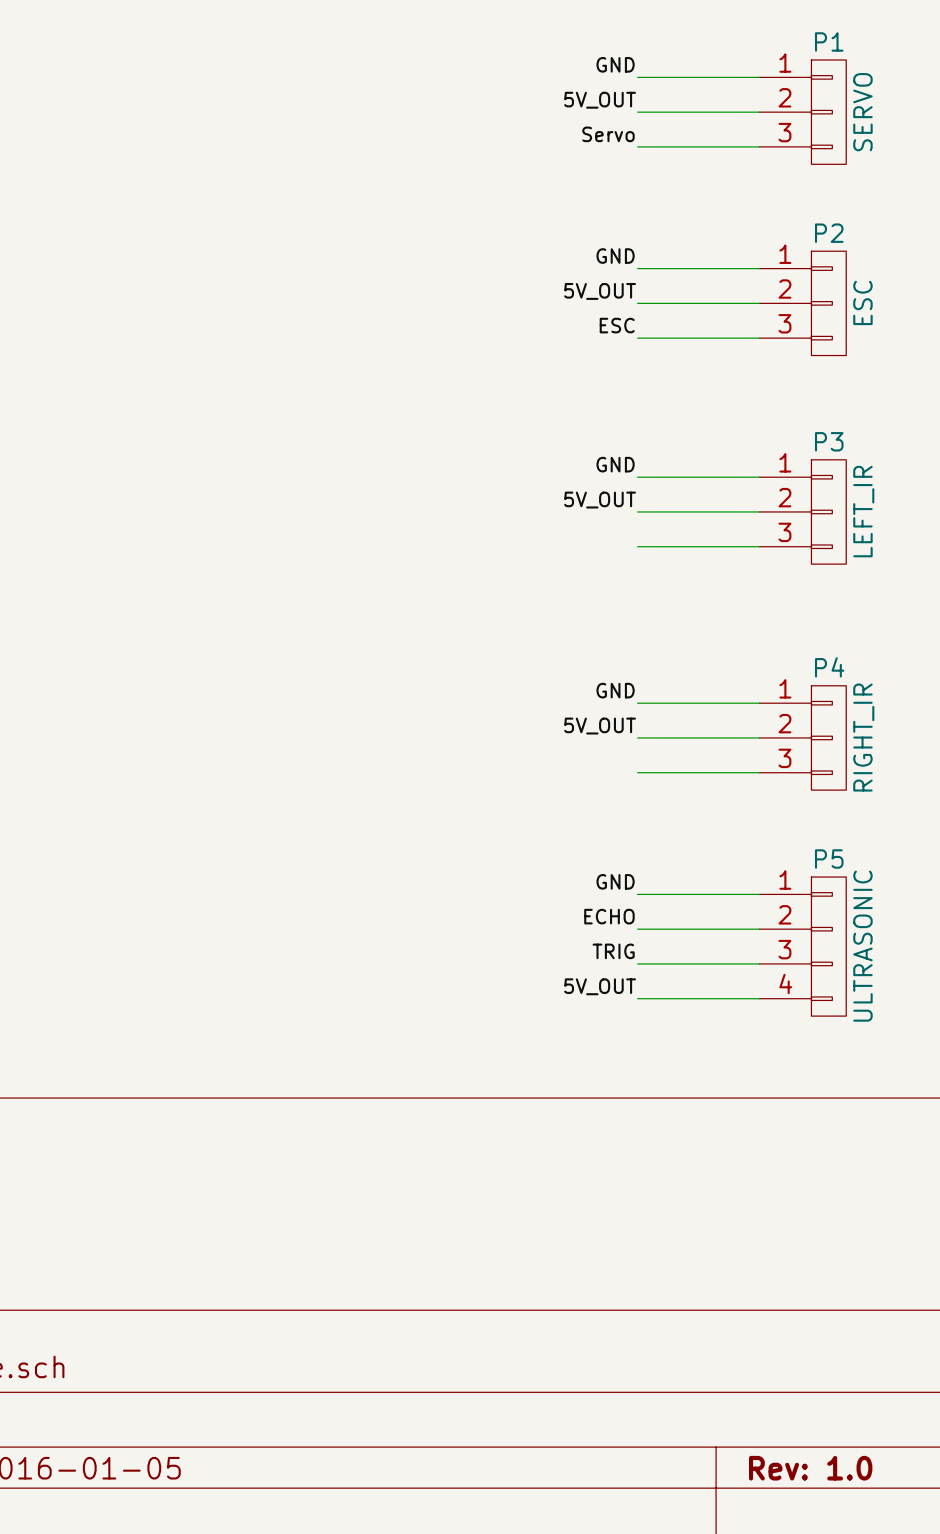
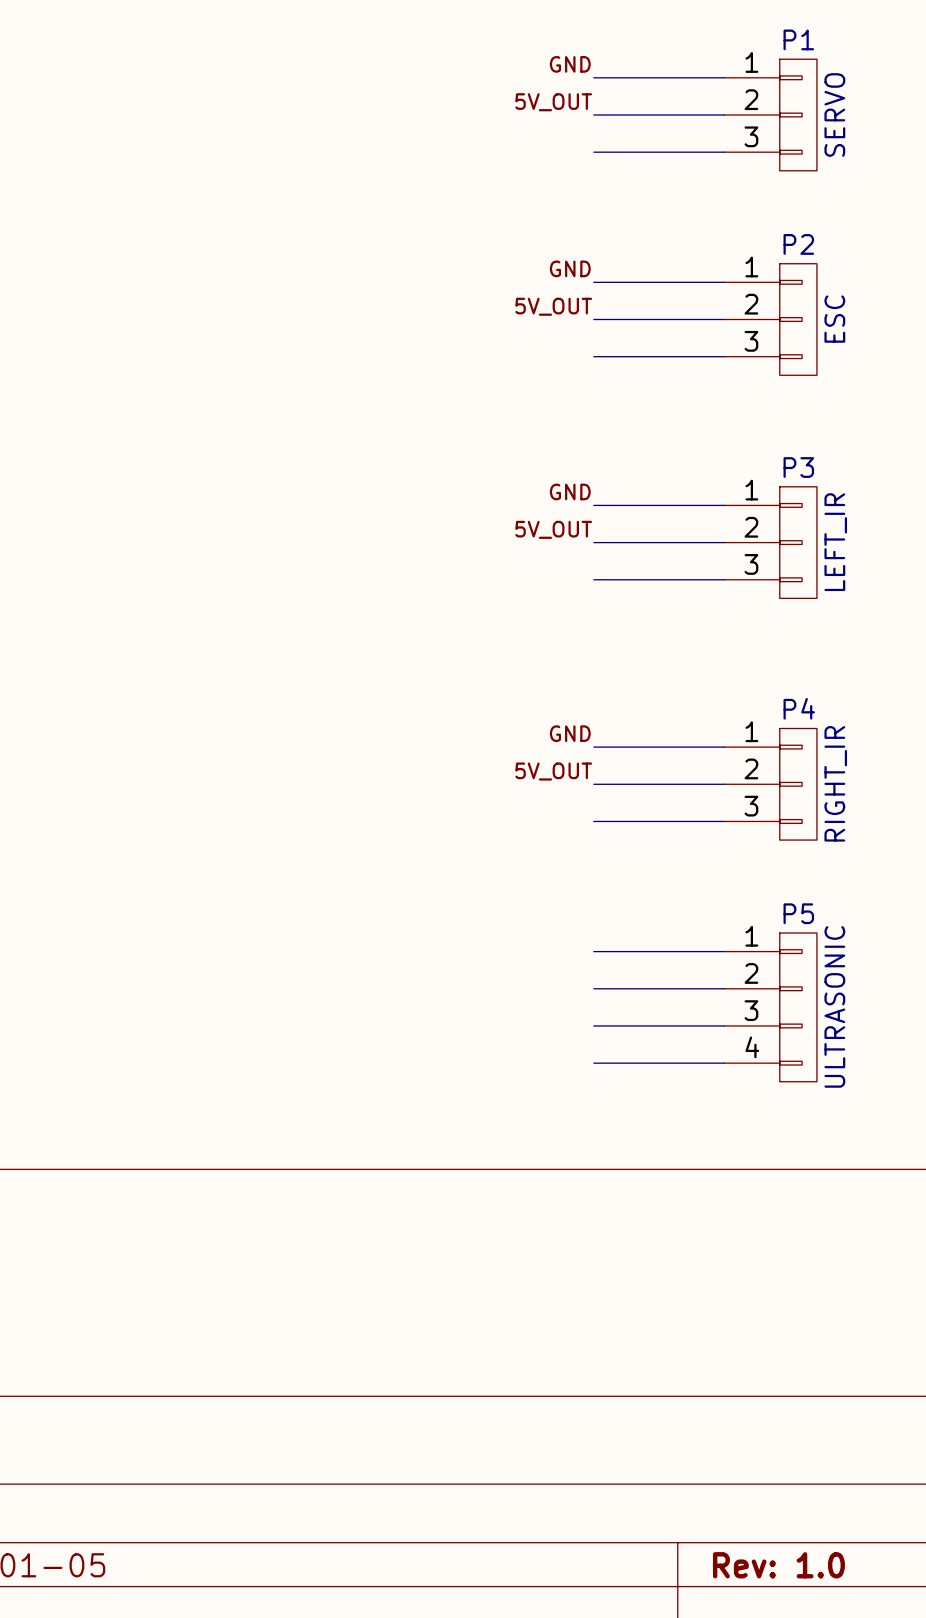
label: Servo (608, 134) -> none
label: ESC (617, 325) -> none
label: GND (615, 881) -> none
label: ECHO (609, 916) -> none
label: TRIG (613, 951) -> none
label: 5V_OUT (600, 986) -> none

